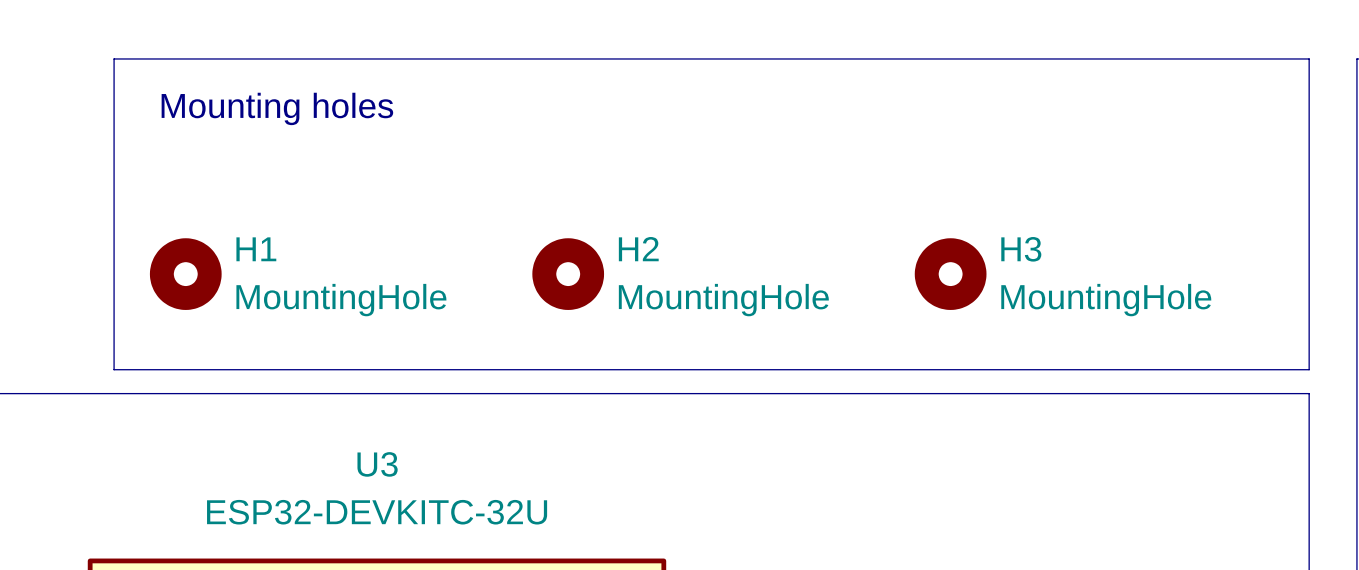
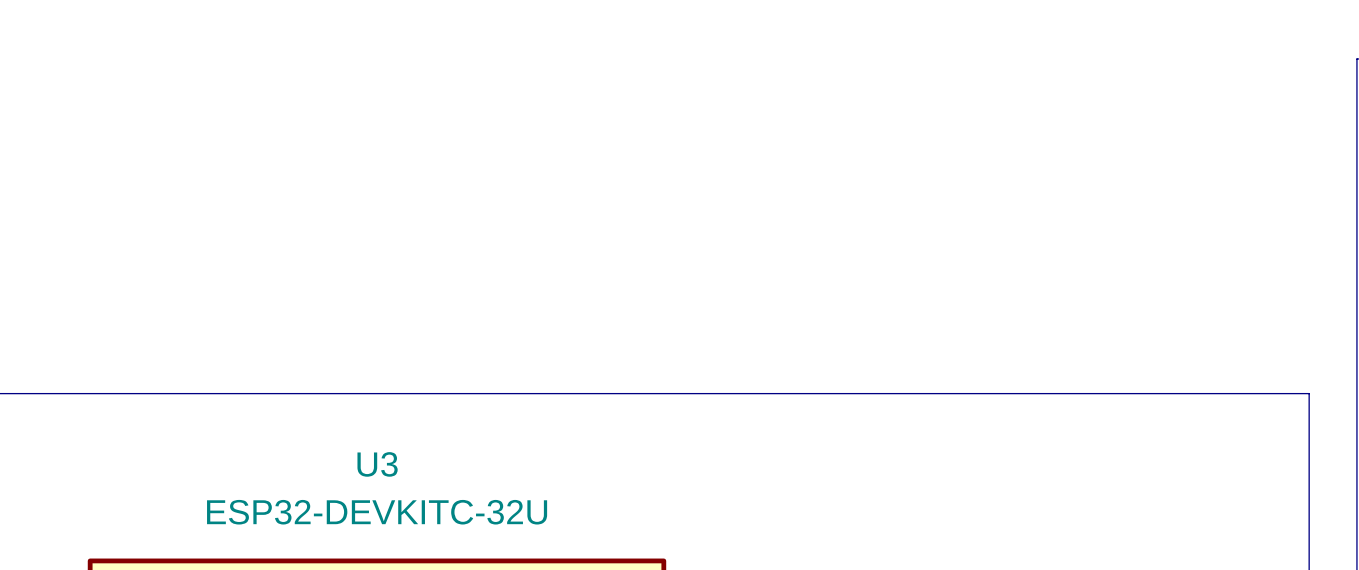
line: (114, 58) (1309, 58) (1309, 369) (114, 369) (114, 58) -> none
text: Mounting holes (277, 108) -> none
H1: MountingHole (185, 274) -> none
H2: MountingHole (568, 274) -> none
H3: MountingHole (950, 274) -> none

